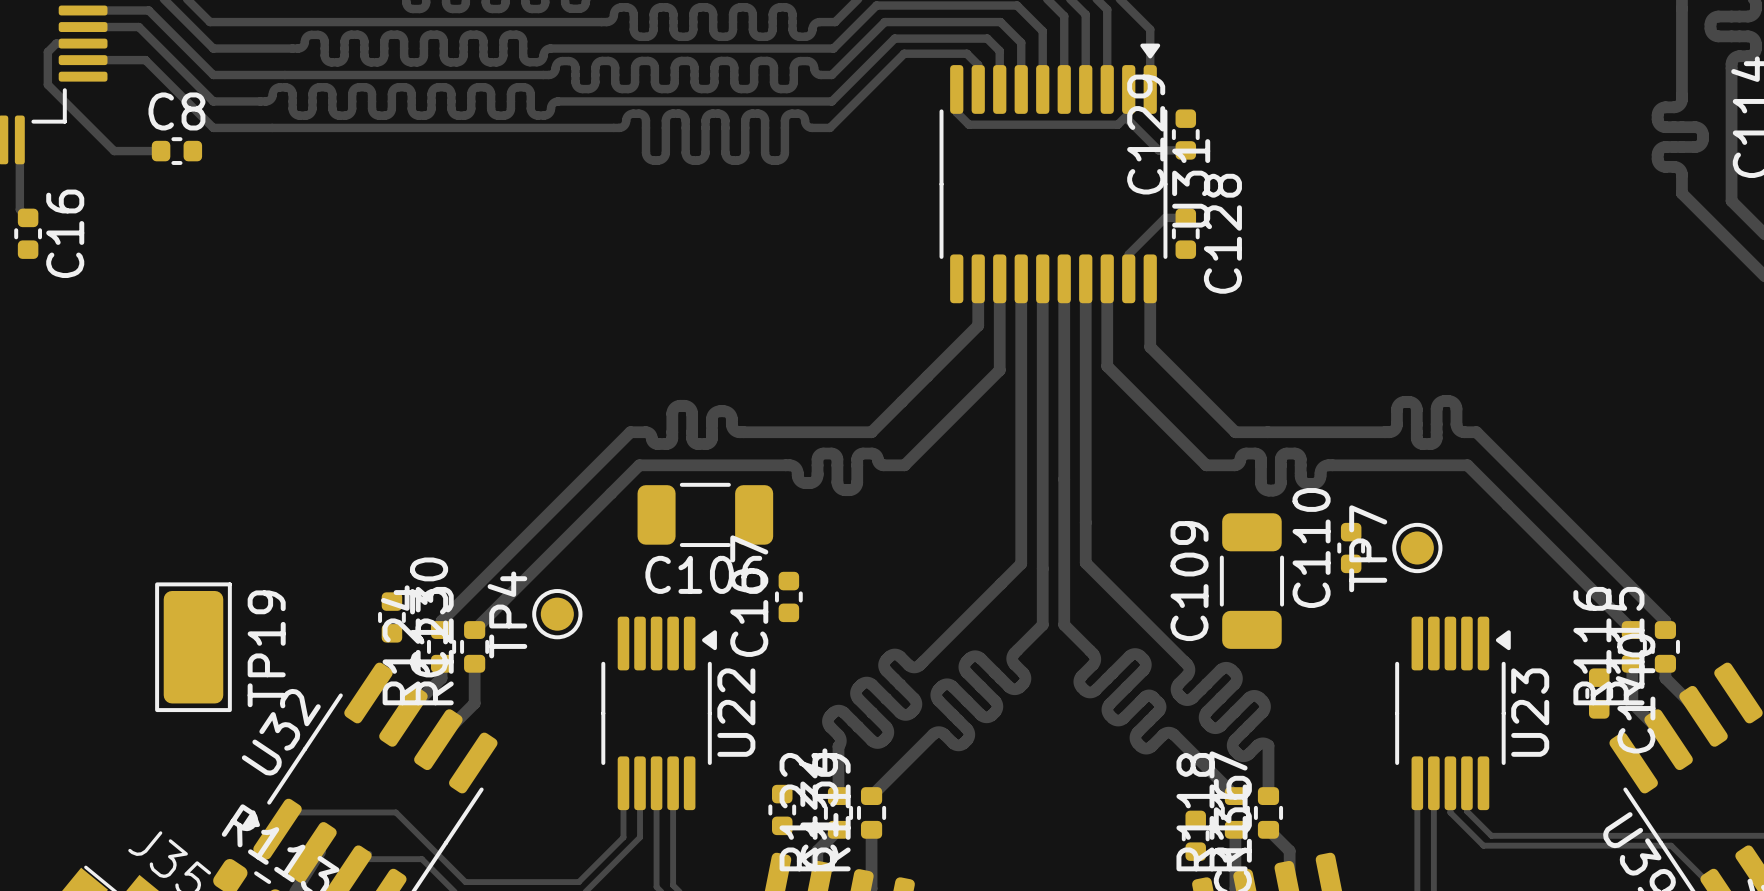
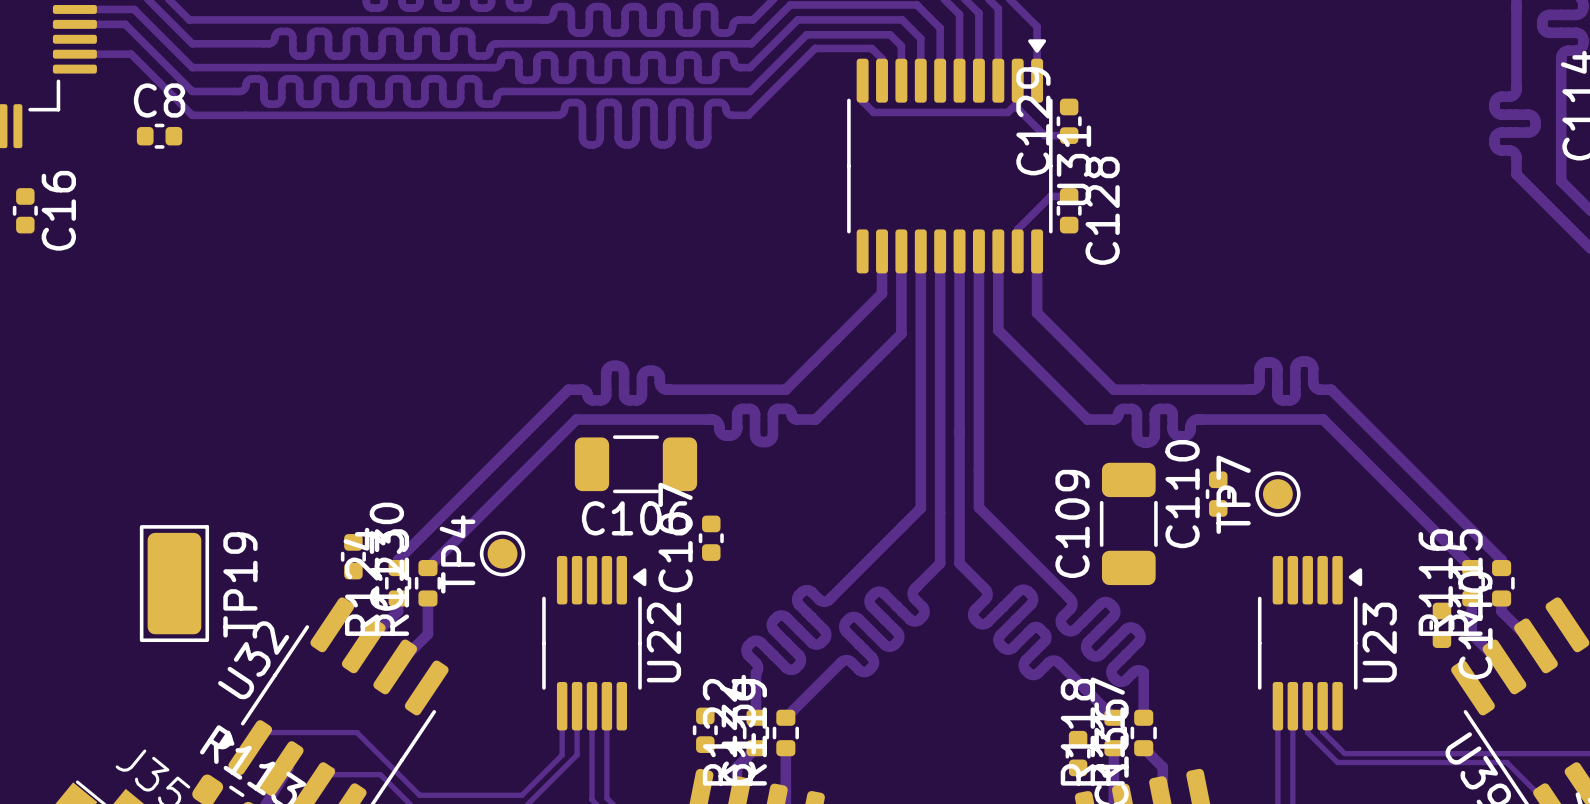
track: (83, 43) (56, 43) (47, 52) (47, 84) (114, 151) (161, 151) -> none
track: (19, 139) (19, 209) (28, 217) -> none

